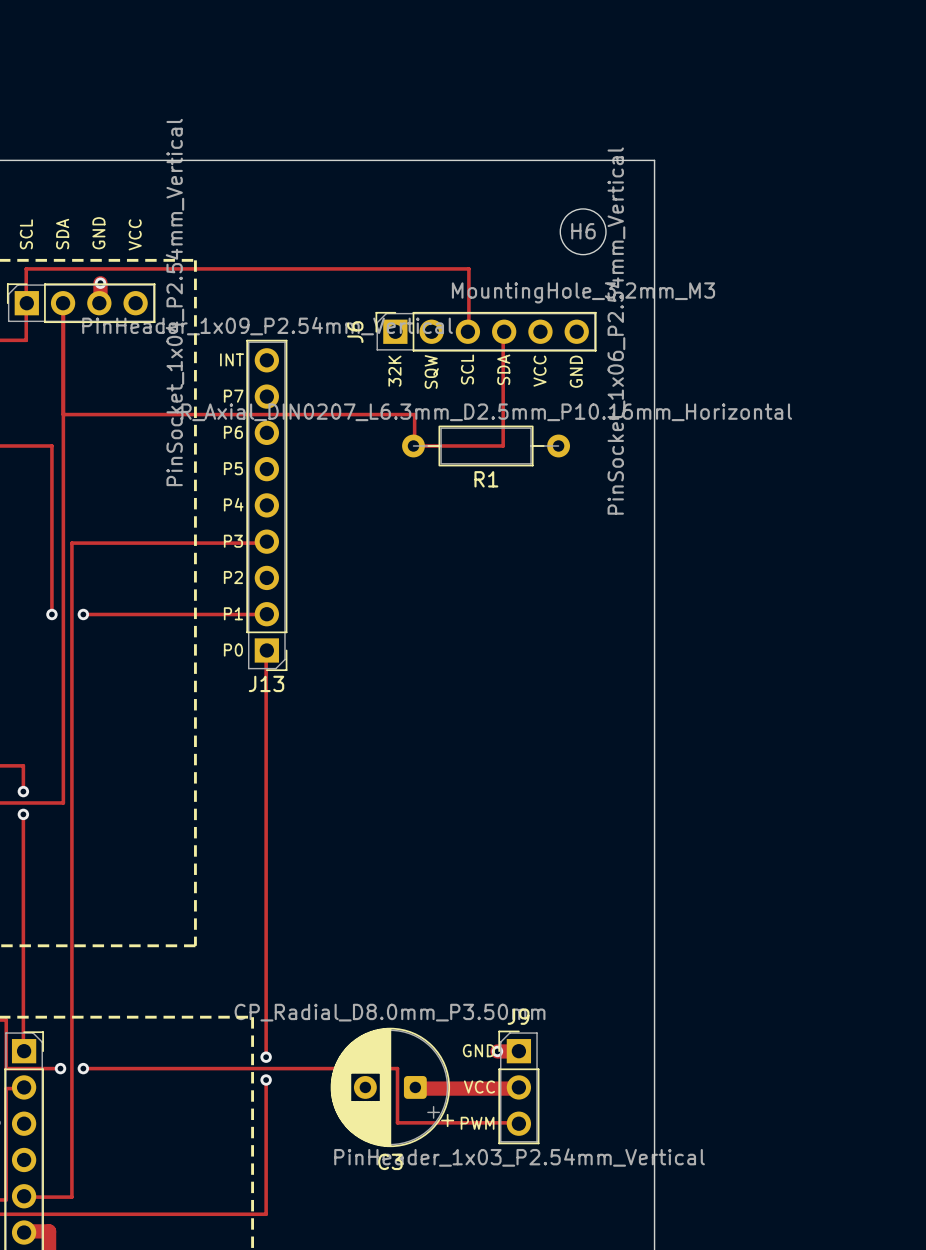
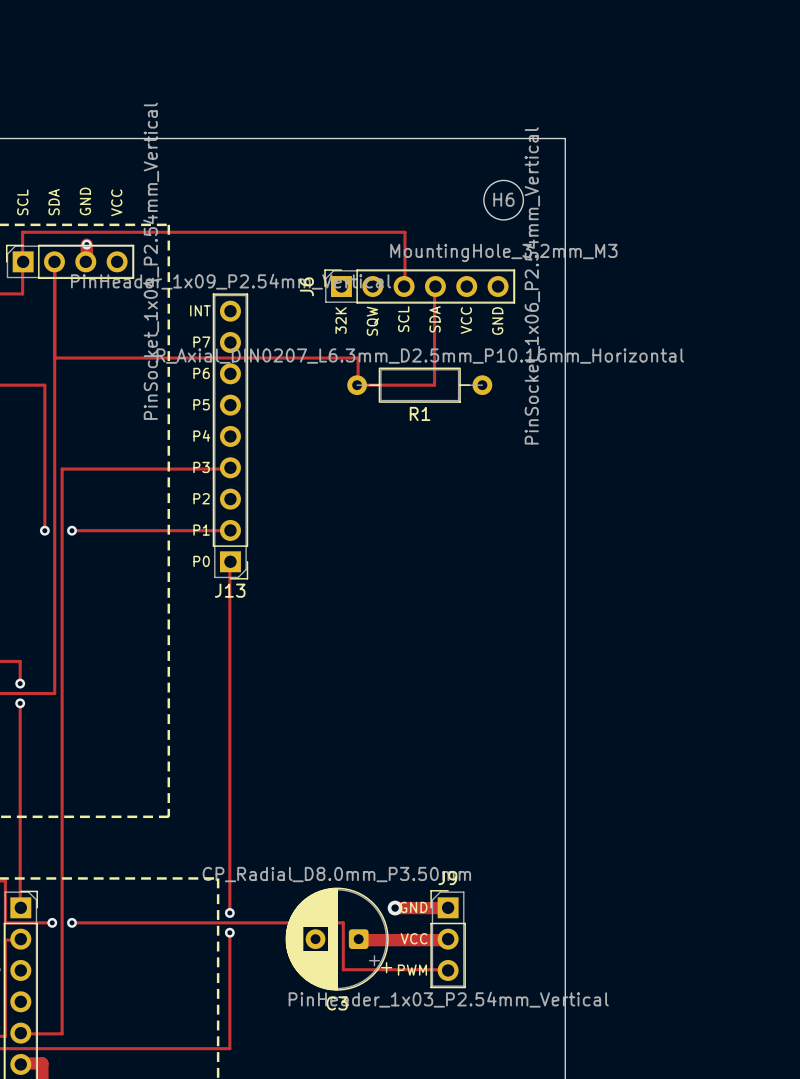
track: none -> (395, 908) (429, 908)
via: none -> (395, 908)
via: (497, 1051) -> none

